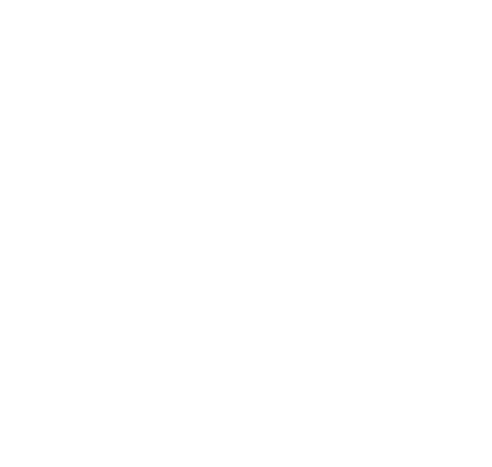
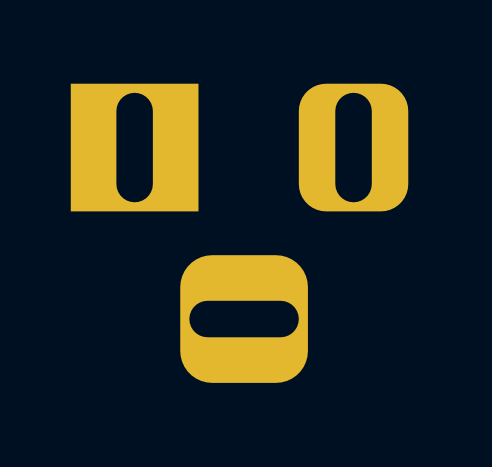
part: none -> (239, 233)

